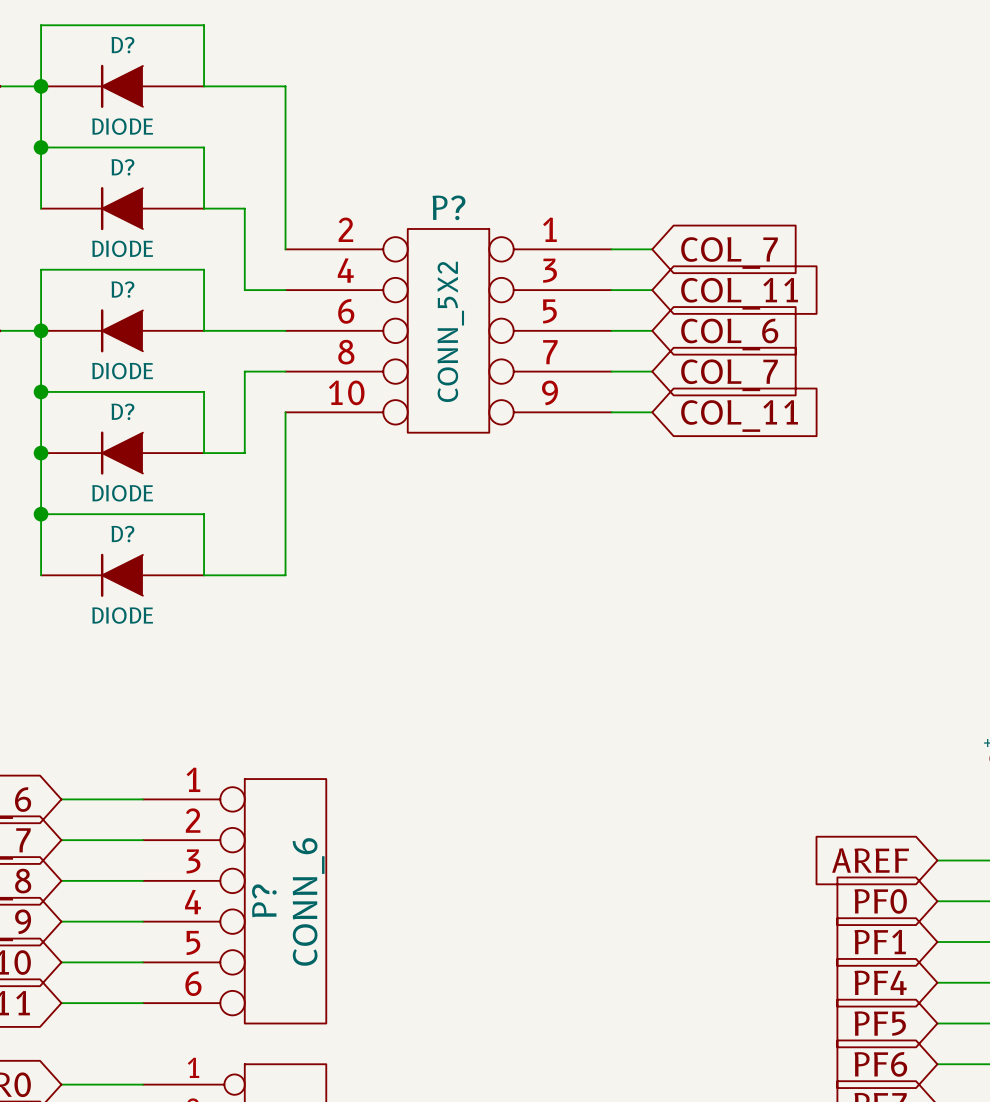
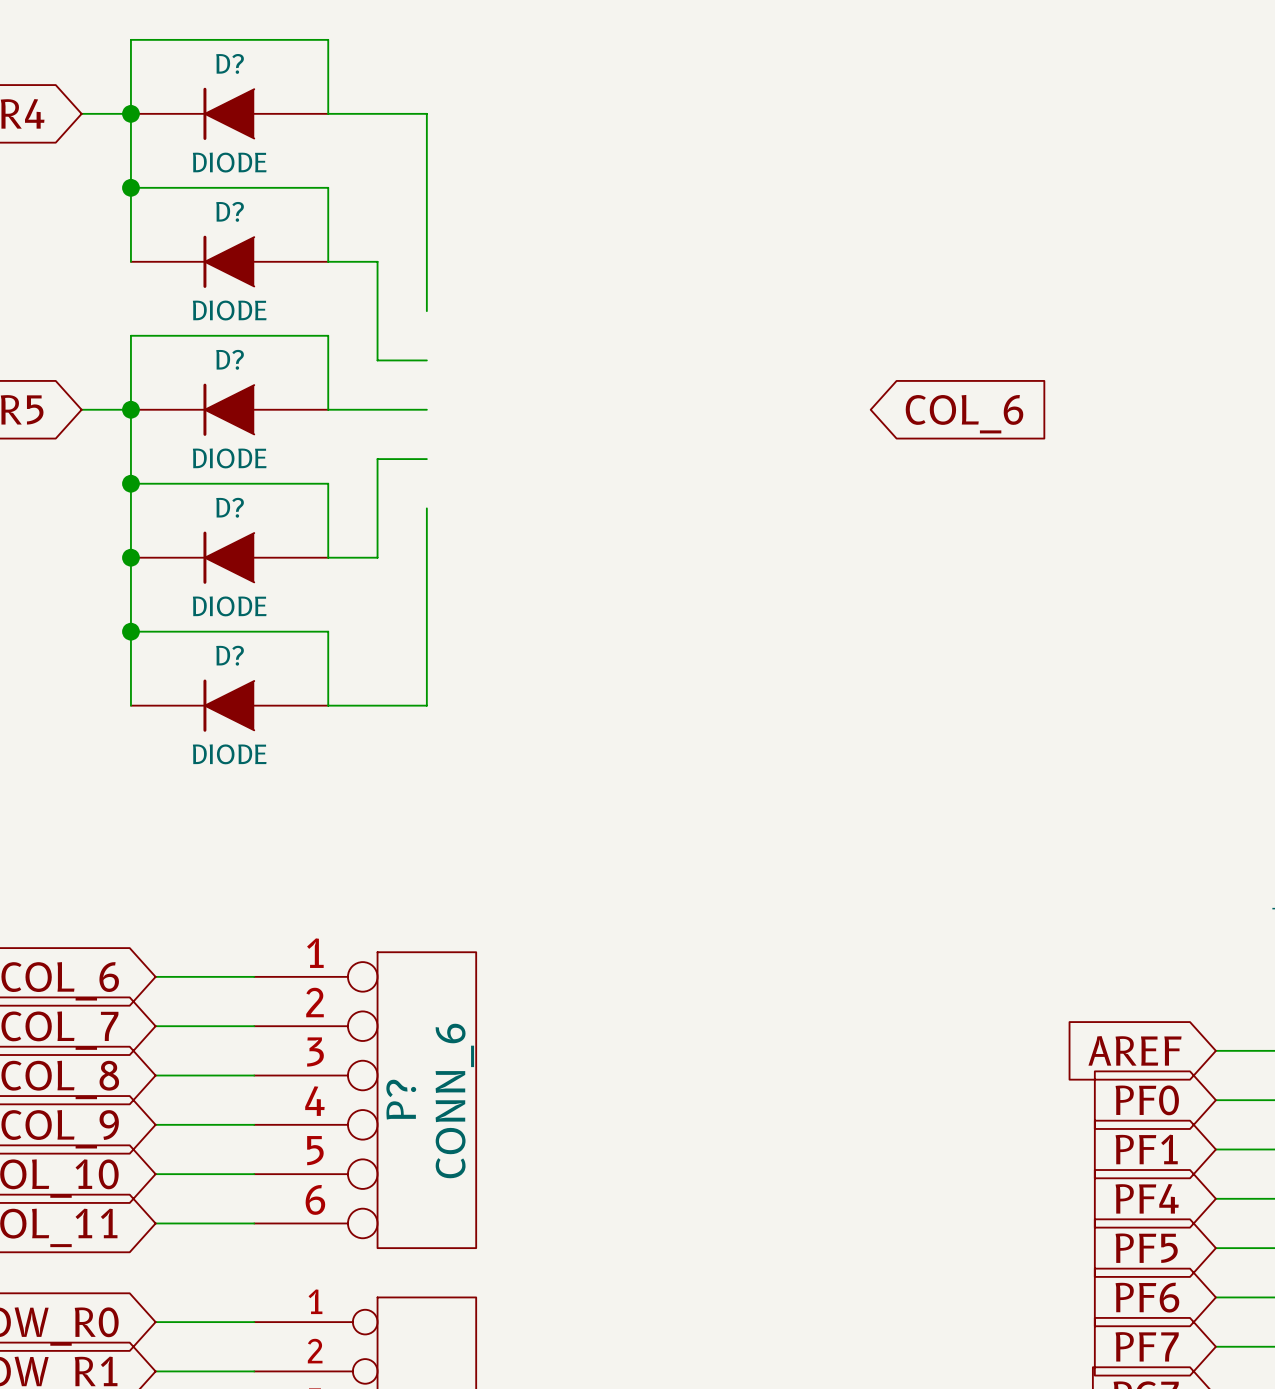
wire: (611, 249) (652, 249) -> none
global label: COL_7 (729, 253) -> none
wire: (611, 290) (652, 290) -> none
global label: COL_11 (739, 293) -> none
P?: CONN_5X2 (448, 330) -> none
wire: (611, 330) (652, 330) -> none
wire: (611, 371) (652, 371) -> none
global label: COL_7 (729, 375) -> none
wire: (611, 412) (652, 412) -> none
global label: COL_11 (739, 415) -> none

